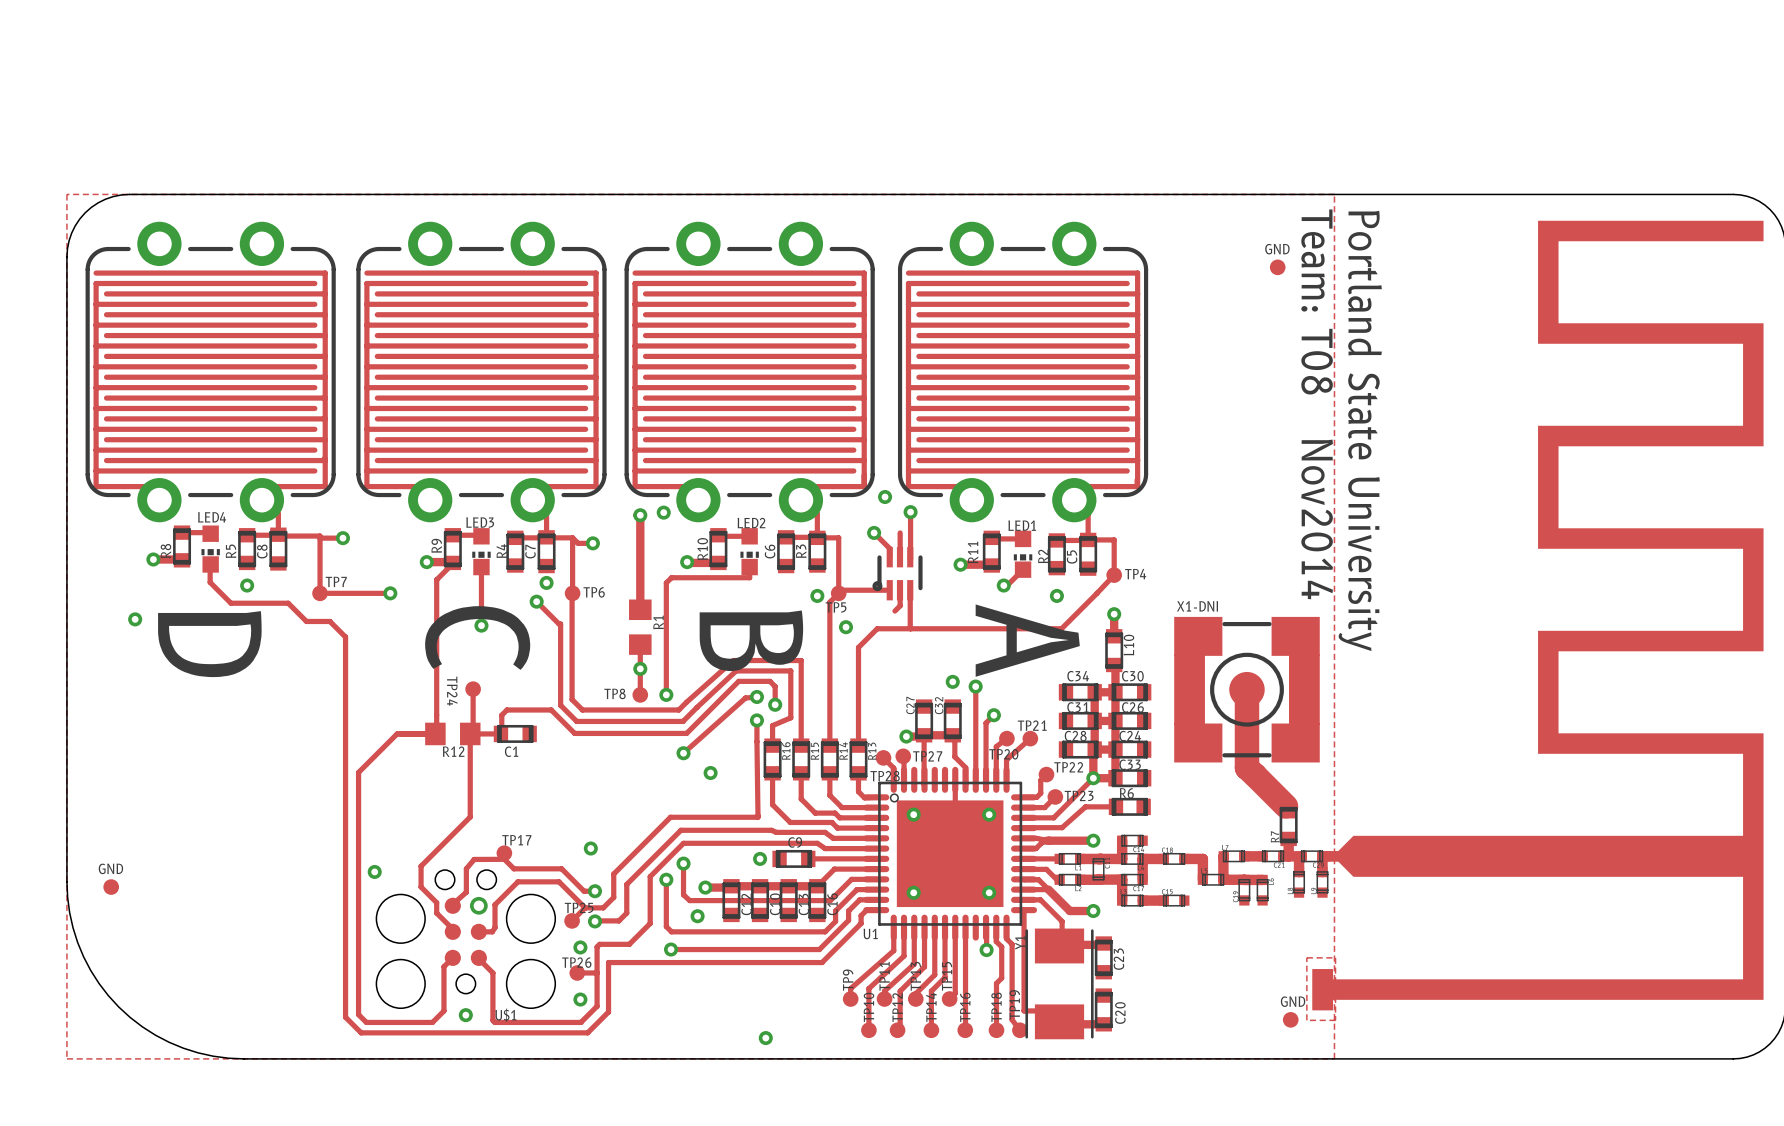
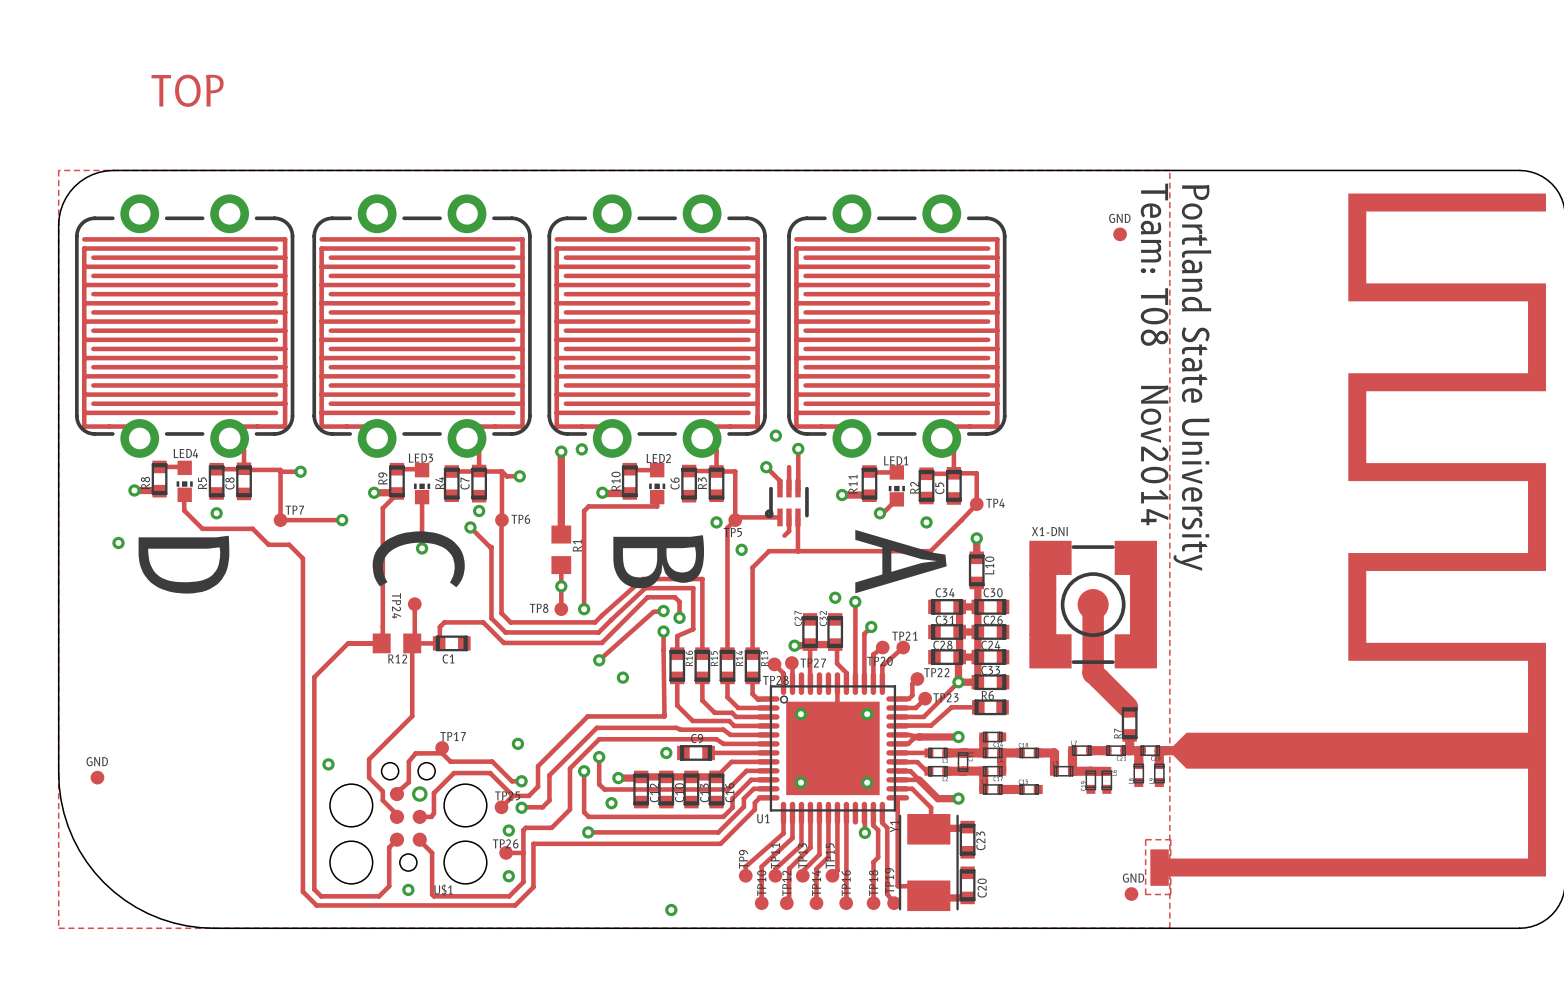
text: none -> TOP (187, 90)

